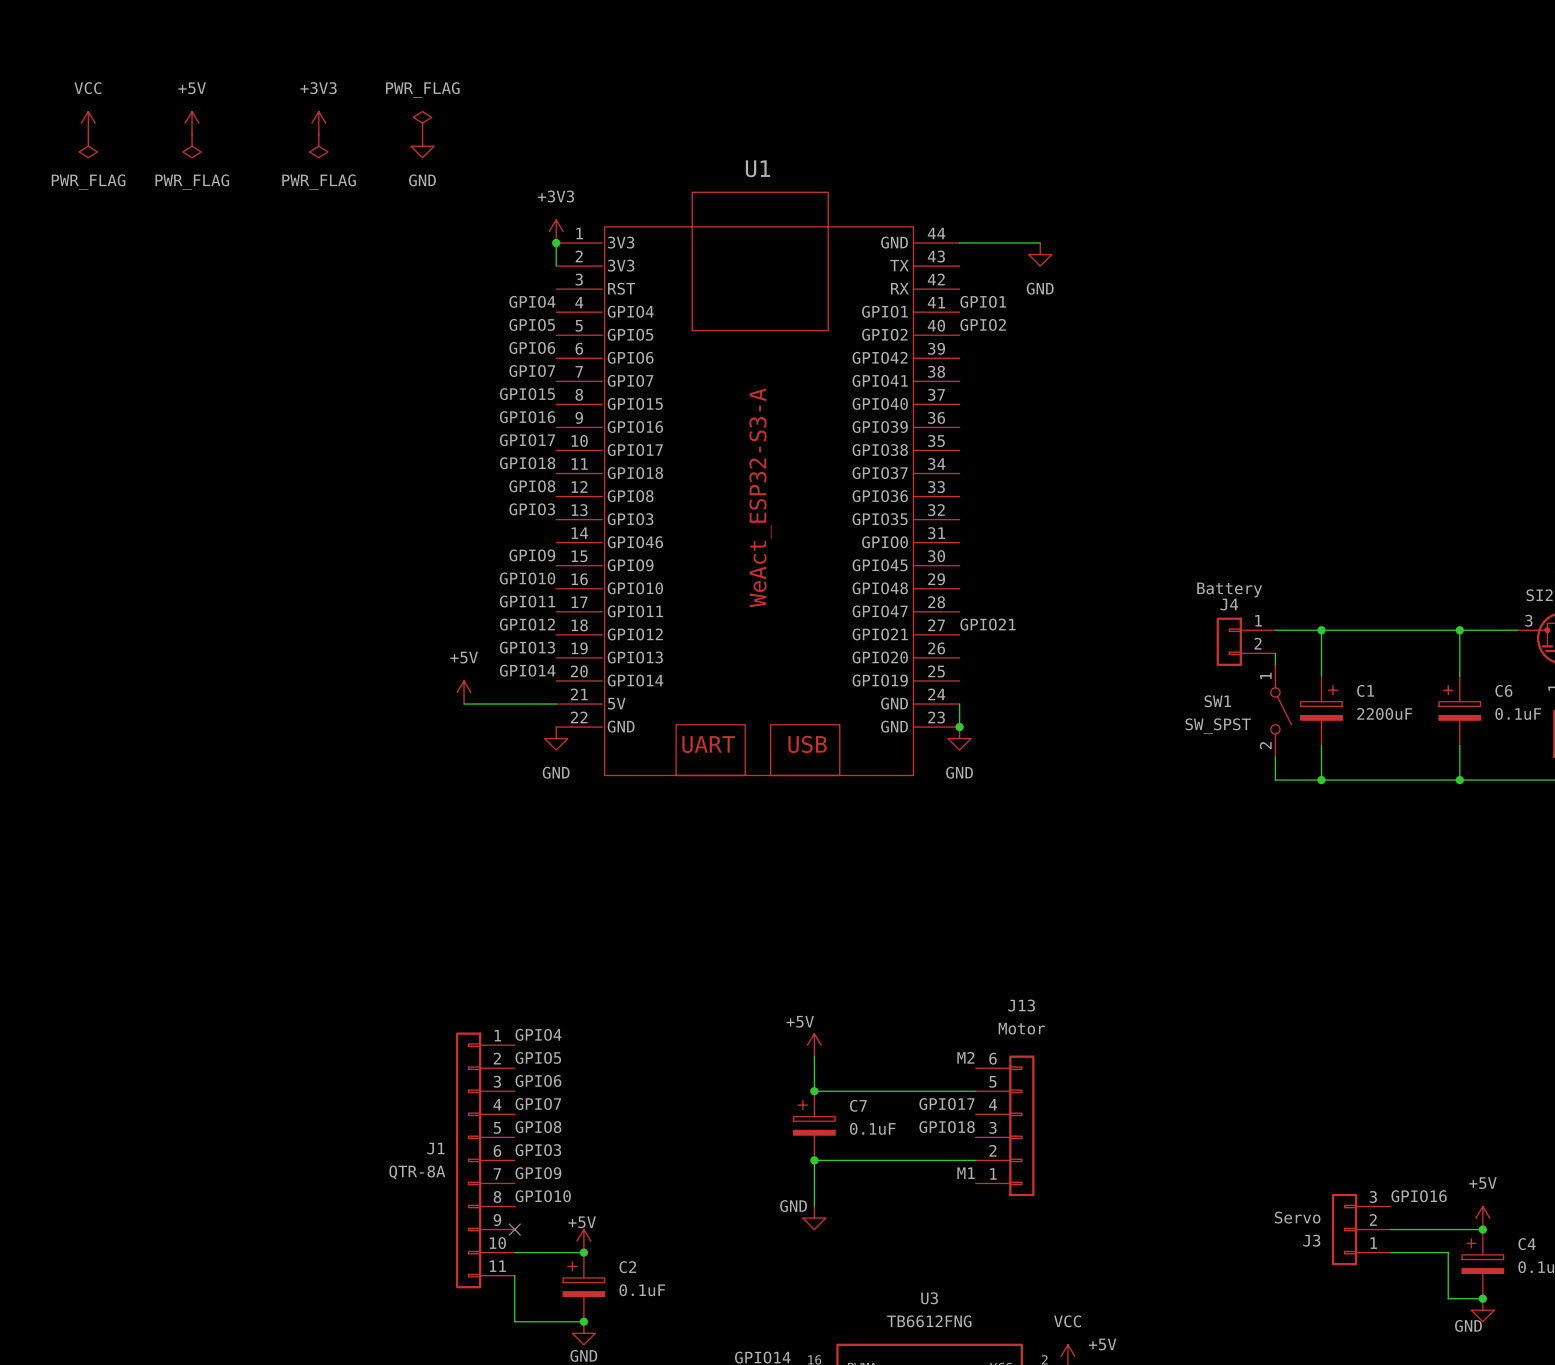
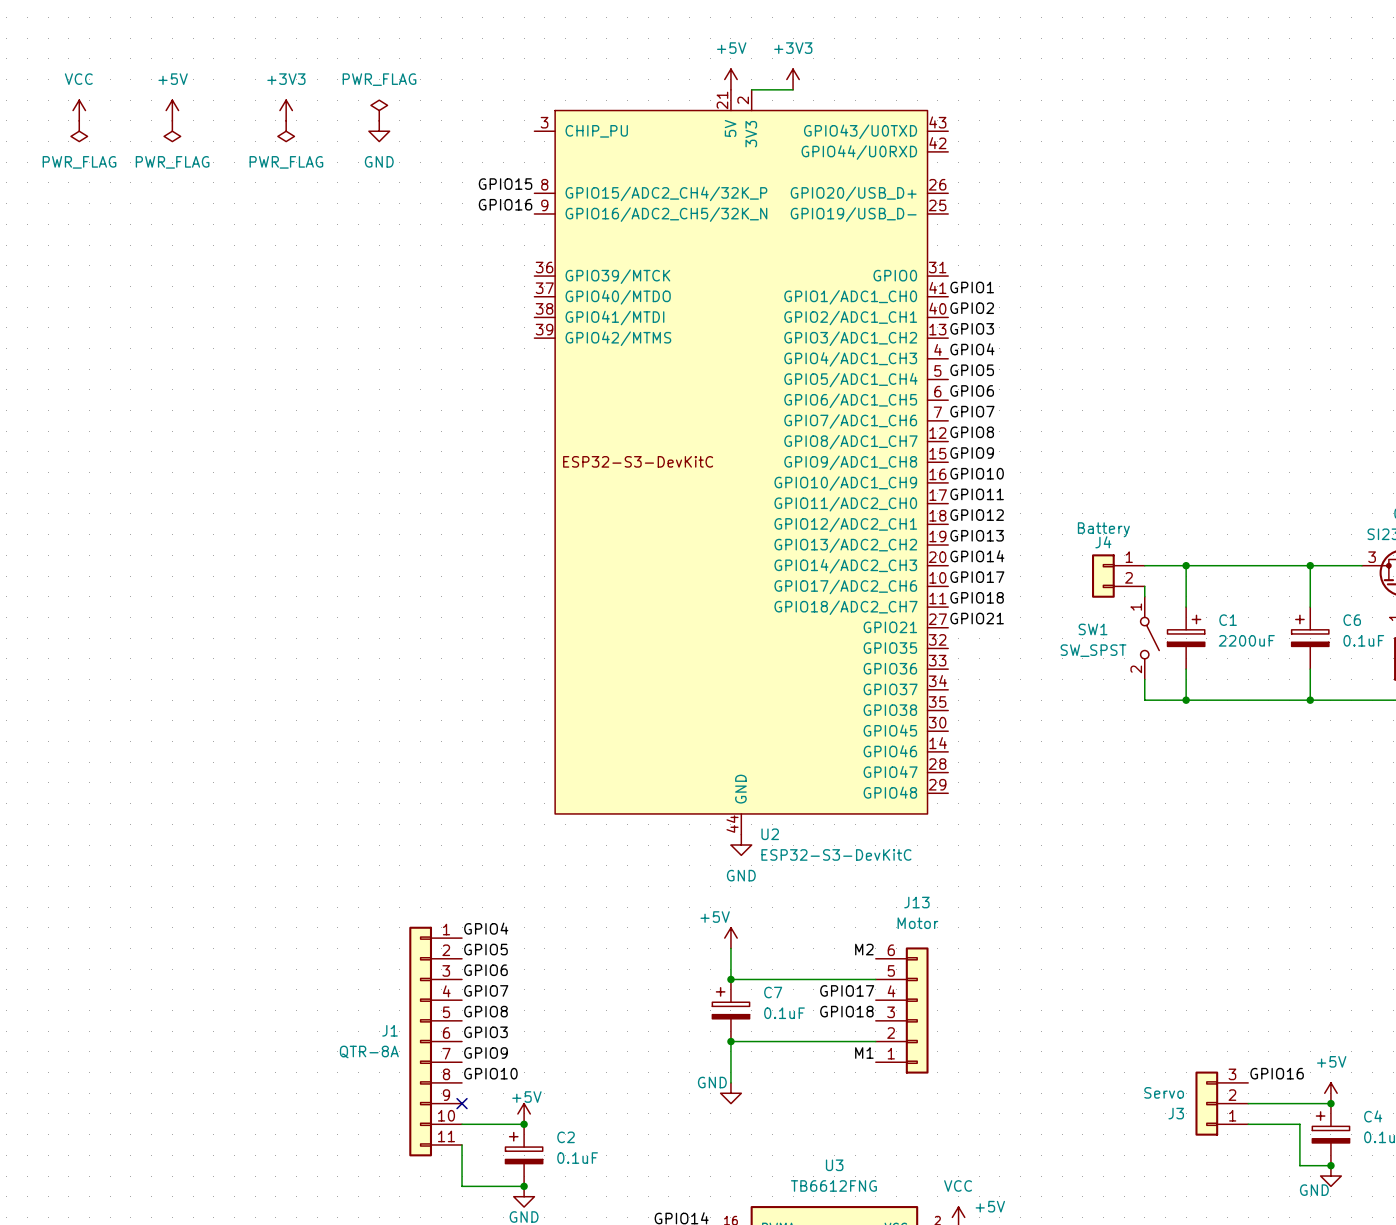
power symbol: none -> +5V (730, 79)
power symbol: none -> +3V3 (793, 79)
wire: none -> (751, 89) (793, 89)
power symbol: +3V3 (556, 231) -> none
wire: (556, 243) (556, 266) -> none
junction: (556, 243) -> none
power symbol: GND (1040, 254) -> none
label: GPIO4 (532, 301) -> none
label position: GPIO1 (983, 301) -> GPIO1 (972, 287)
label: GPIO5 (532, 324) -> none
label position: GPIO2 (983, 324) -> GPIO2 (972, 308)
label: GPIO6 (532, 347) -> none
label: none -> GPIO3 (972, 328)
label: GPIO7 (532, 371) -> none
label: none -> GPIO4 (972, 349)
label position: GPIO15 (527, 394) -> GPIO15 (505, 184)
label: none -> GPIO5 (972, 370)
label position: GPIO16 (527, 417) -> GPIO16 (505, 204)
label: none -> GPIO6 (972, 390)
label: GPIO17 (527, 440) -> none
label: none -> GPIO7 (972, 411)
label: GPIO18 (527, 463) -> none
label: none -> GPIO8 (972, 432)
U1: (757, 483) -> none
label: GPIO8 (532, 486) -> none
label: none -> GPIO9 (972, 453)
label: GPIO3 (532, 509) -> none
U2: none -> ESP32-S3-DevKitC (741, 462)
label: none -> GPIO10 (977, 473)
label: none -> GPIO11 (977, 494)
label: GPIO9 (532, 555) -> none
label: none -> GPIO12 (977, 515)
label: GPIO10 (527, 578) -> none
label: none -> GPIO13 (977, 535)
label: GPIO11 (527, 601) -> none
label: none -> GPIO14 (977, 556)
label: GPIO12 (527, 624) -> none
label position: GPIO21 (988, 624) -> GPIO21 (977, 618)
label: none -> GPIO17 (977, 577)
label: GPIO13 (527, 647) -> none
label: none -> GPIO18 (977, 597)
label: GPIO14 (527, 670) -> none
power symbol: +5V (464, 692) -> none
wire: (464, 704) (556, 704) -> none
junction: (959, 727) -> none
power symbol: GND (556, 738) -> none
power symbol: GND (959, 738) -> none
power symbol: none -> GND (741, 845)

